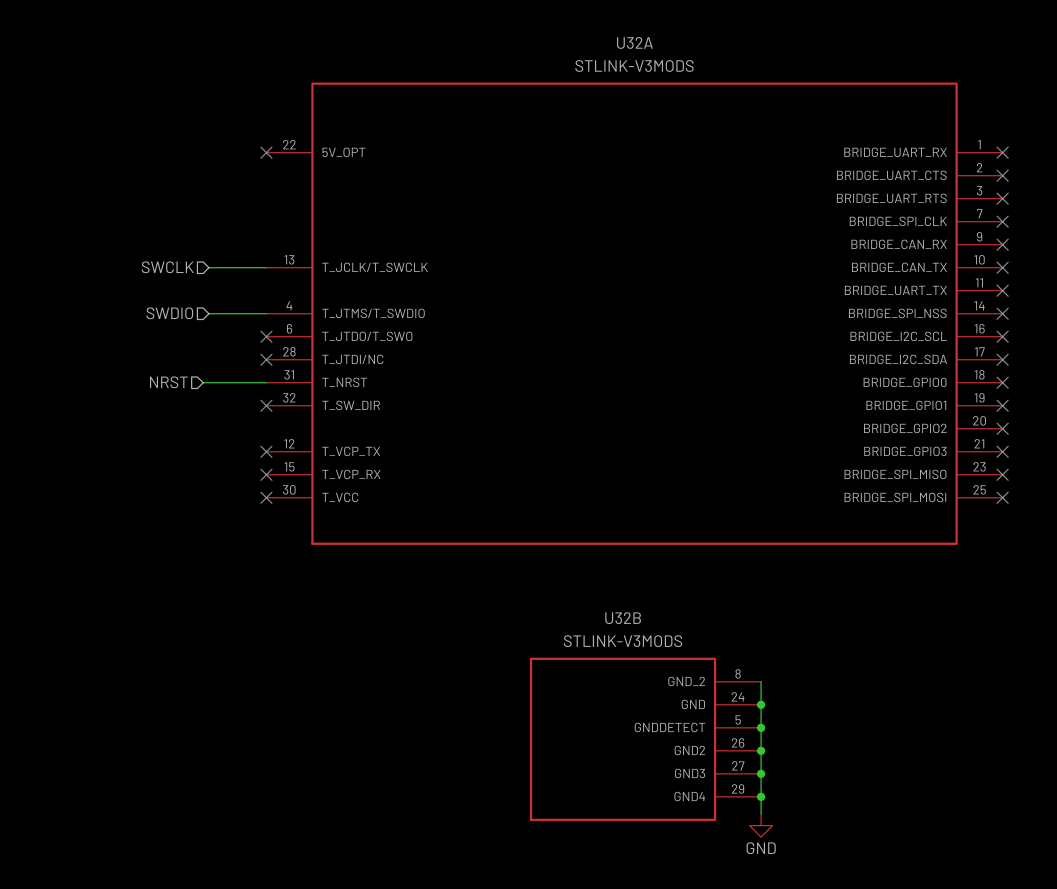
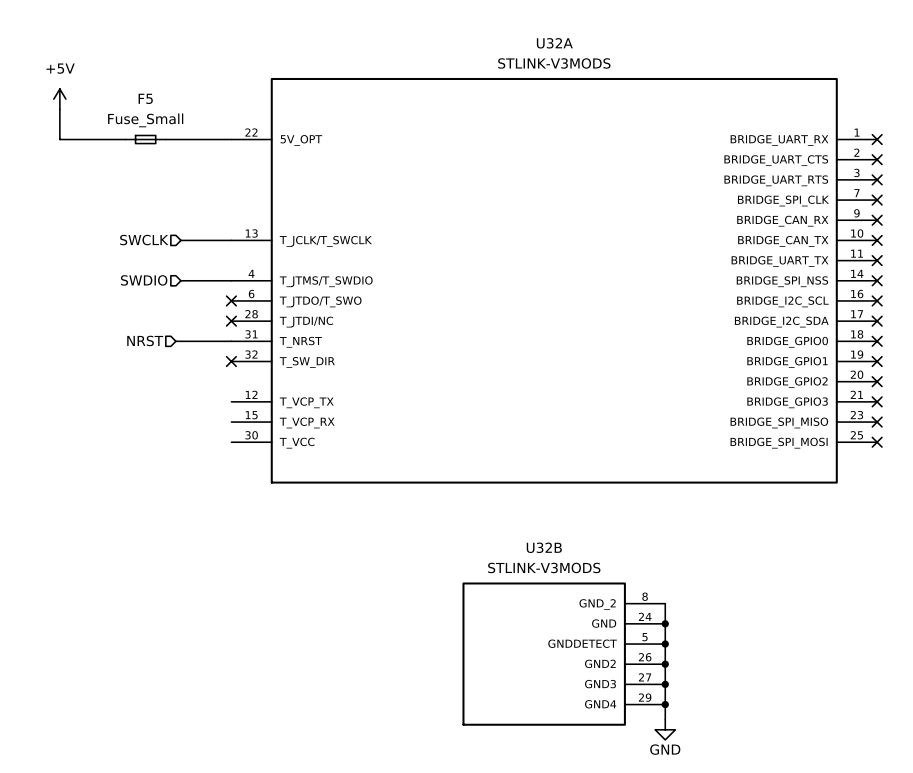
power symbol: none -> +5V (59, 99)
wire: none -> (59, 109) (59, 139) (125, 139)
F5: none -> Fuse_Small (145, 139)
wire: none -> (165, 139) (231, 139)
no-connect mark: (266, 152) -> none
no-connect mark: (266, 451) -> none
no-connect mark: (266, 474) -> none
no-connect mark: (266, 497) -> none

